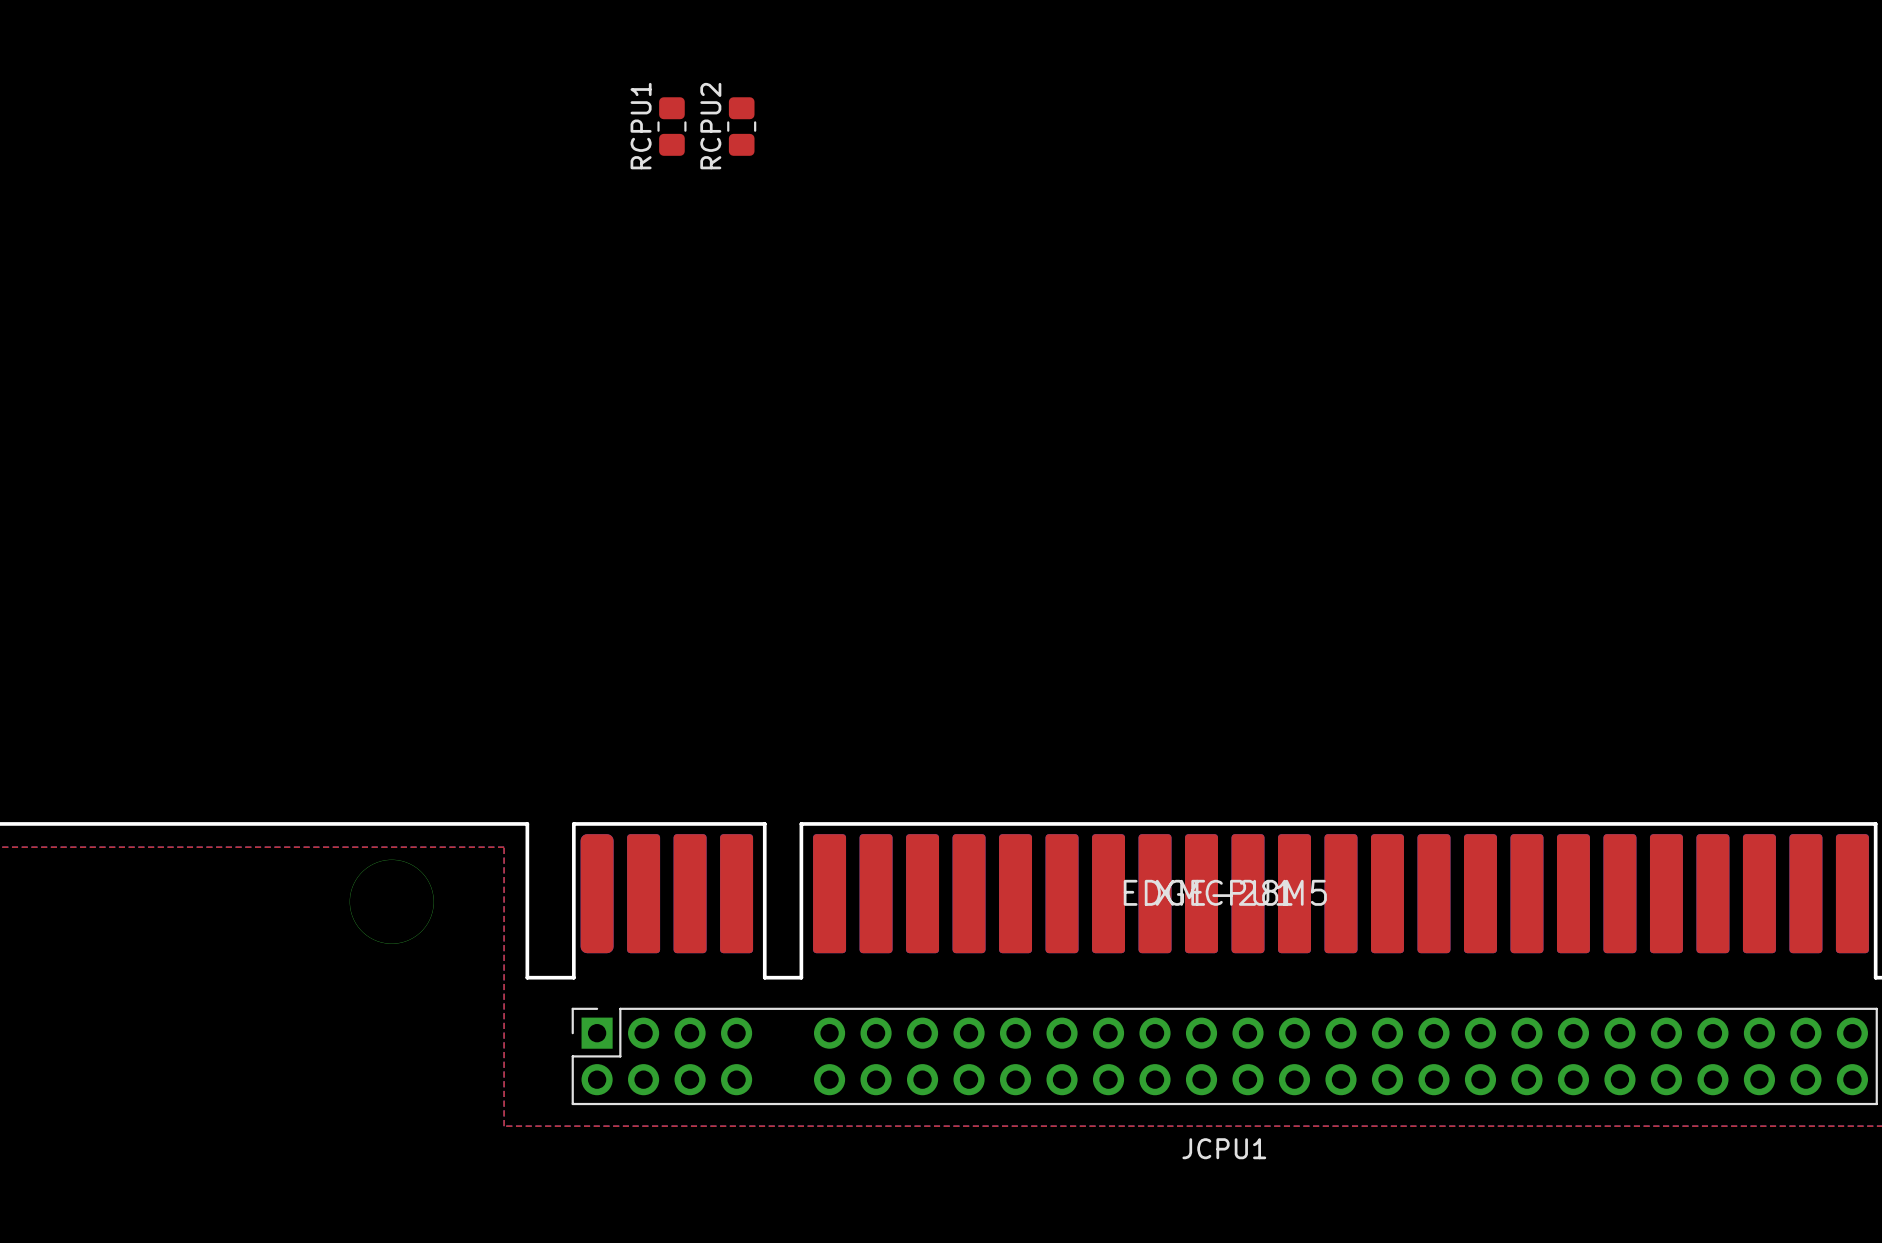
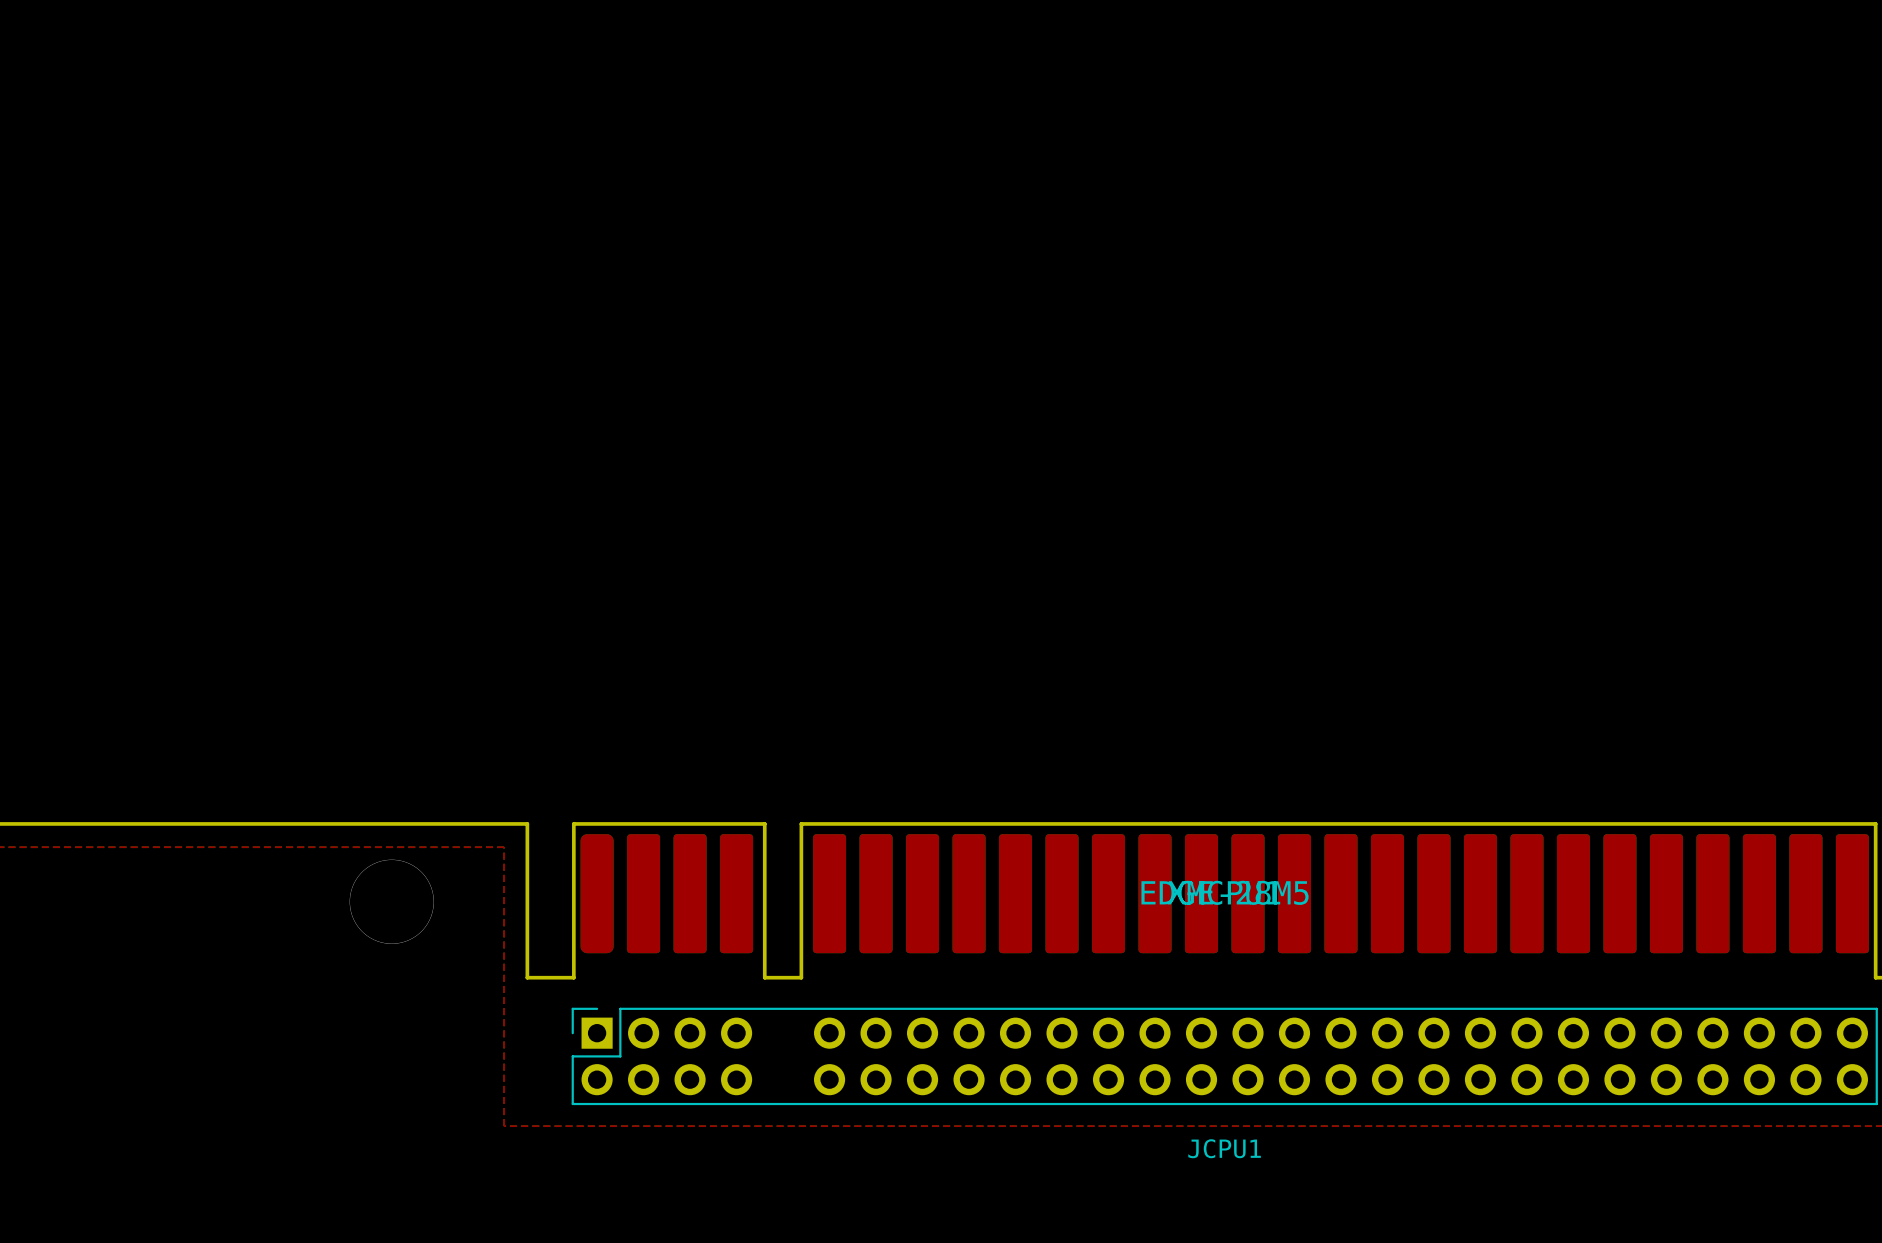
RCPU1: (671, 126) -> none
RCPU2: (741, 126) -> none

